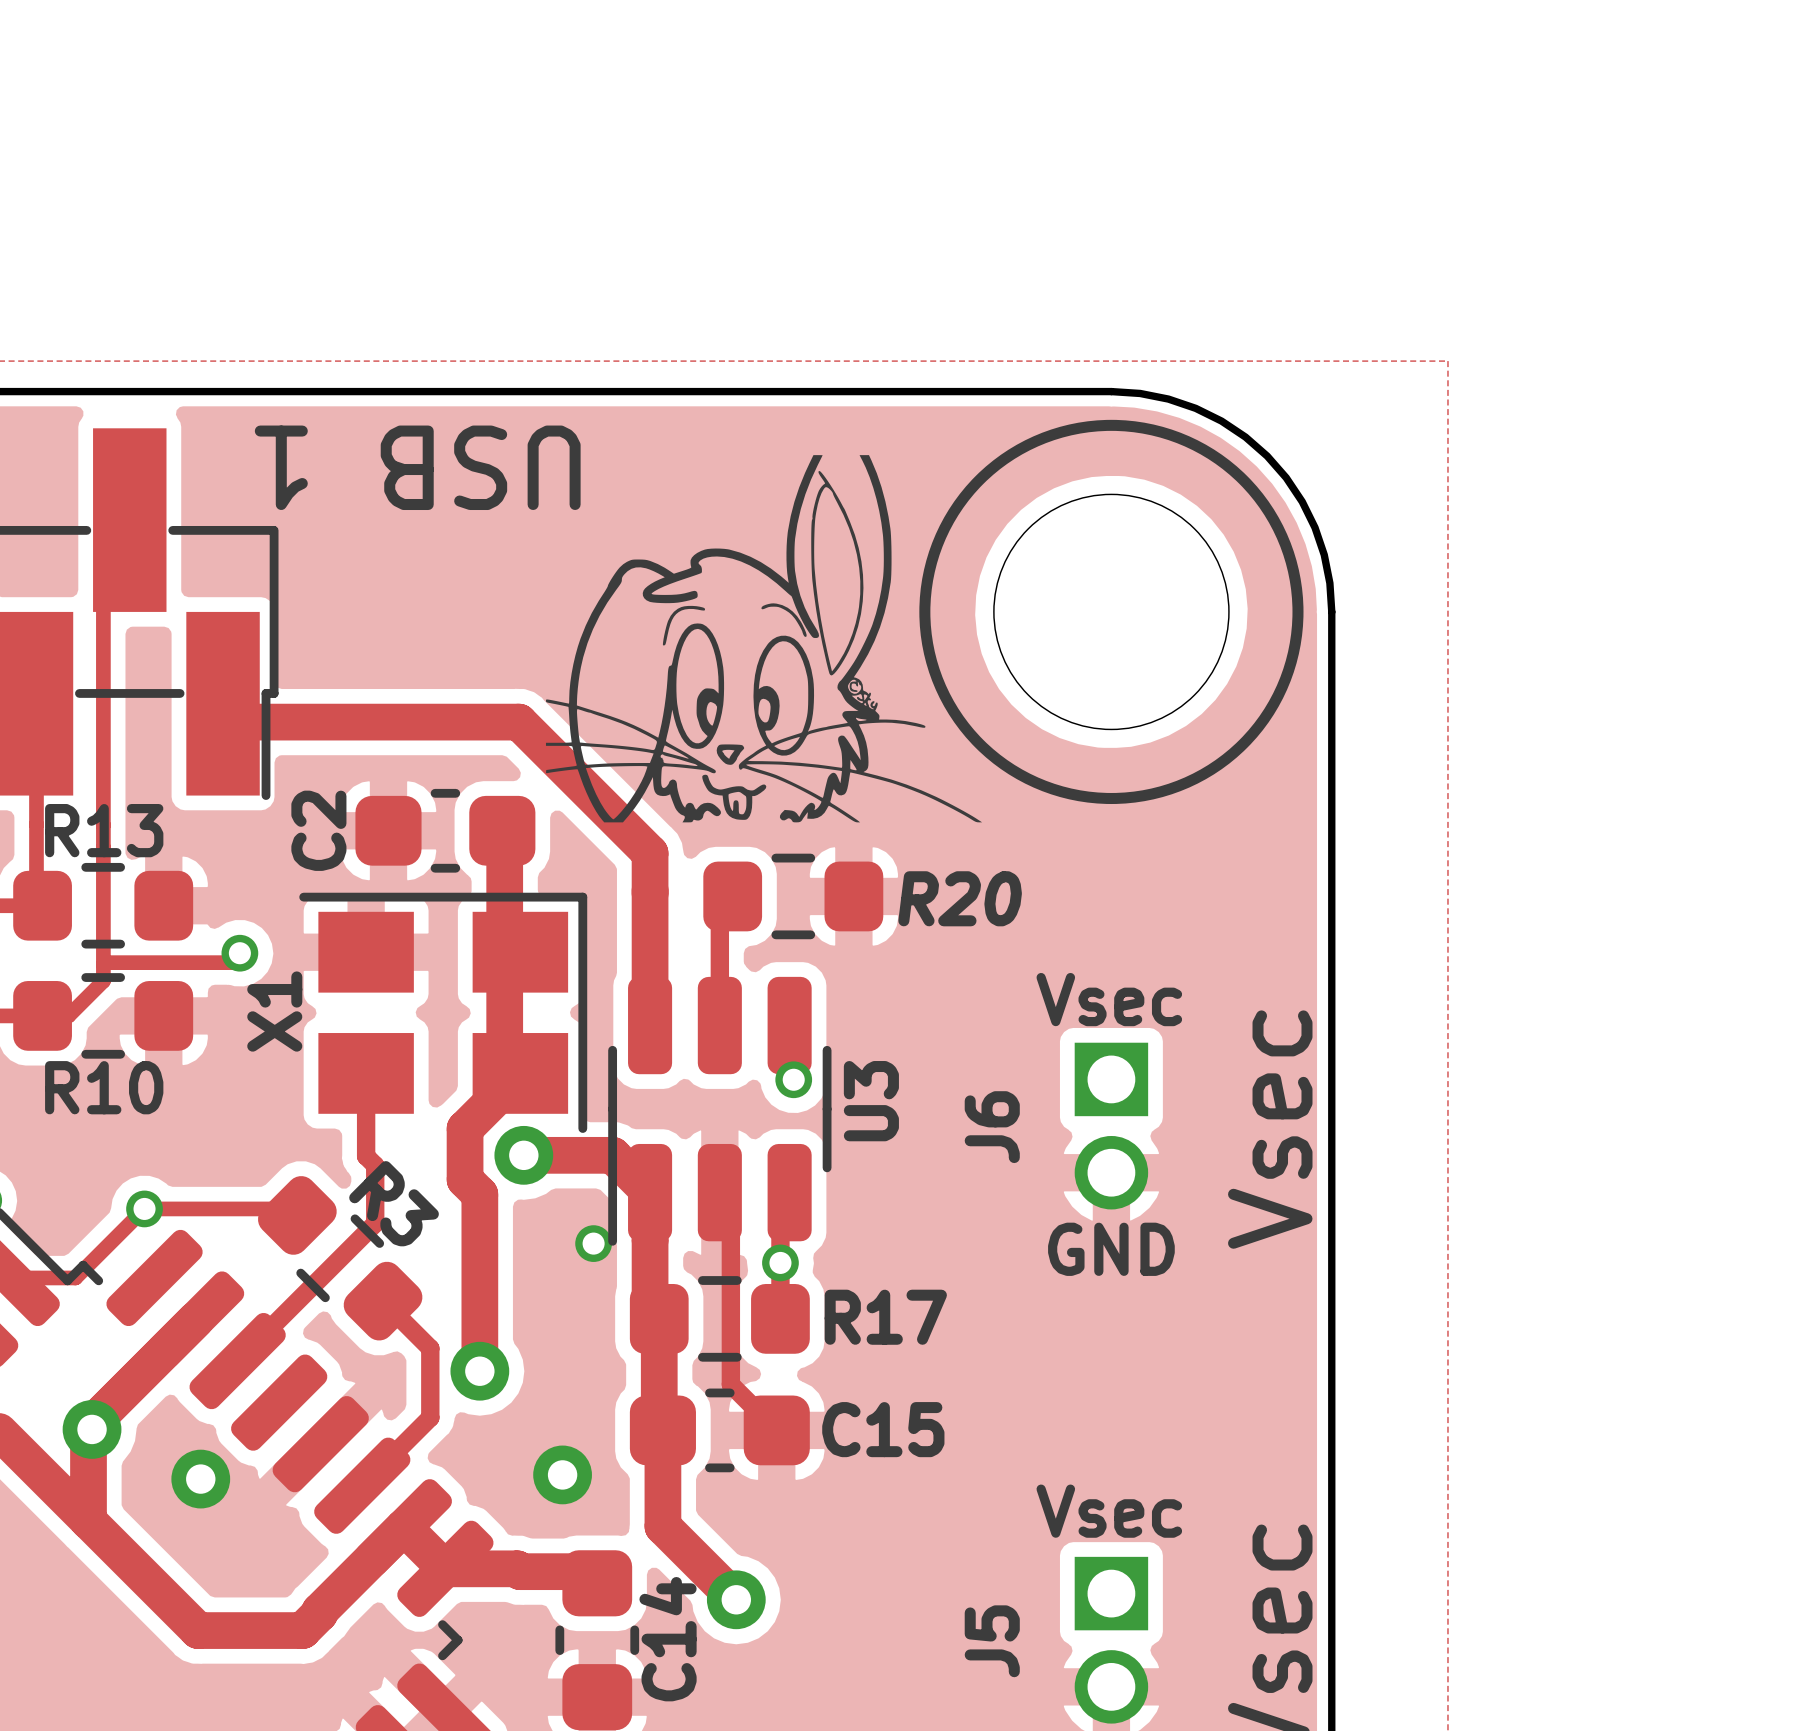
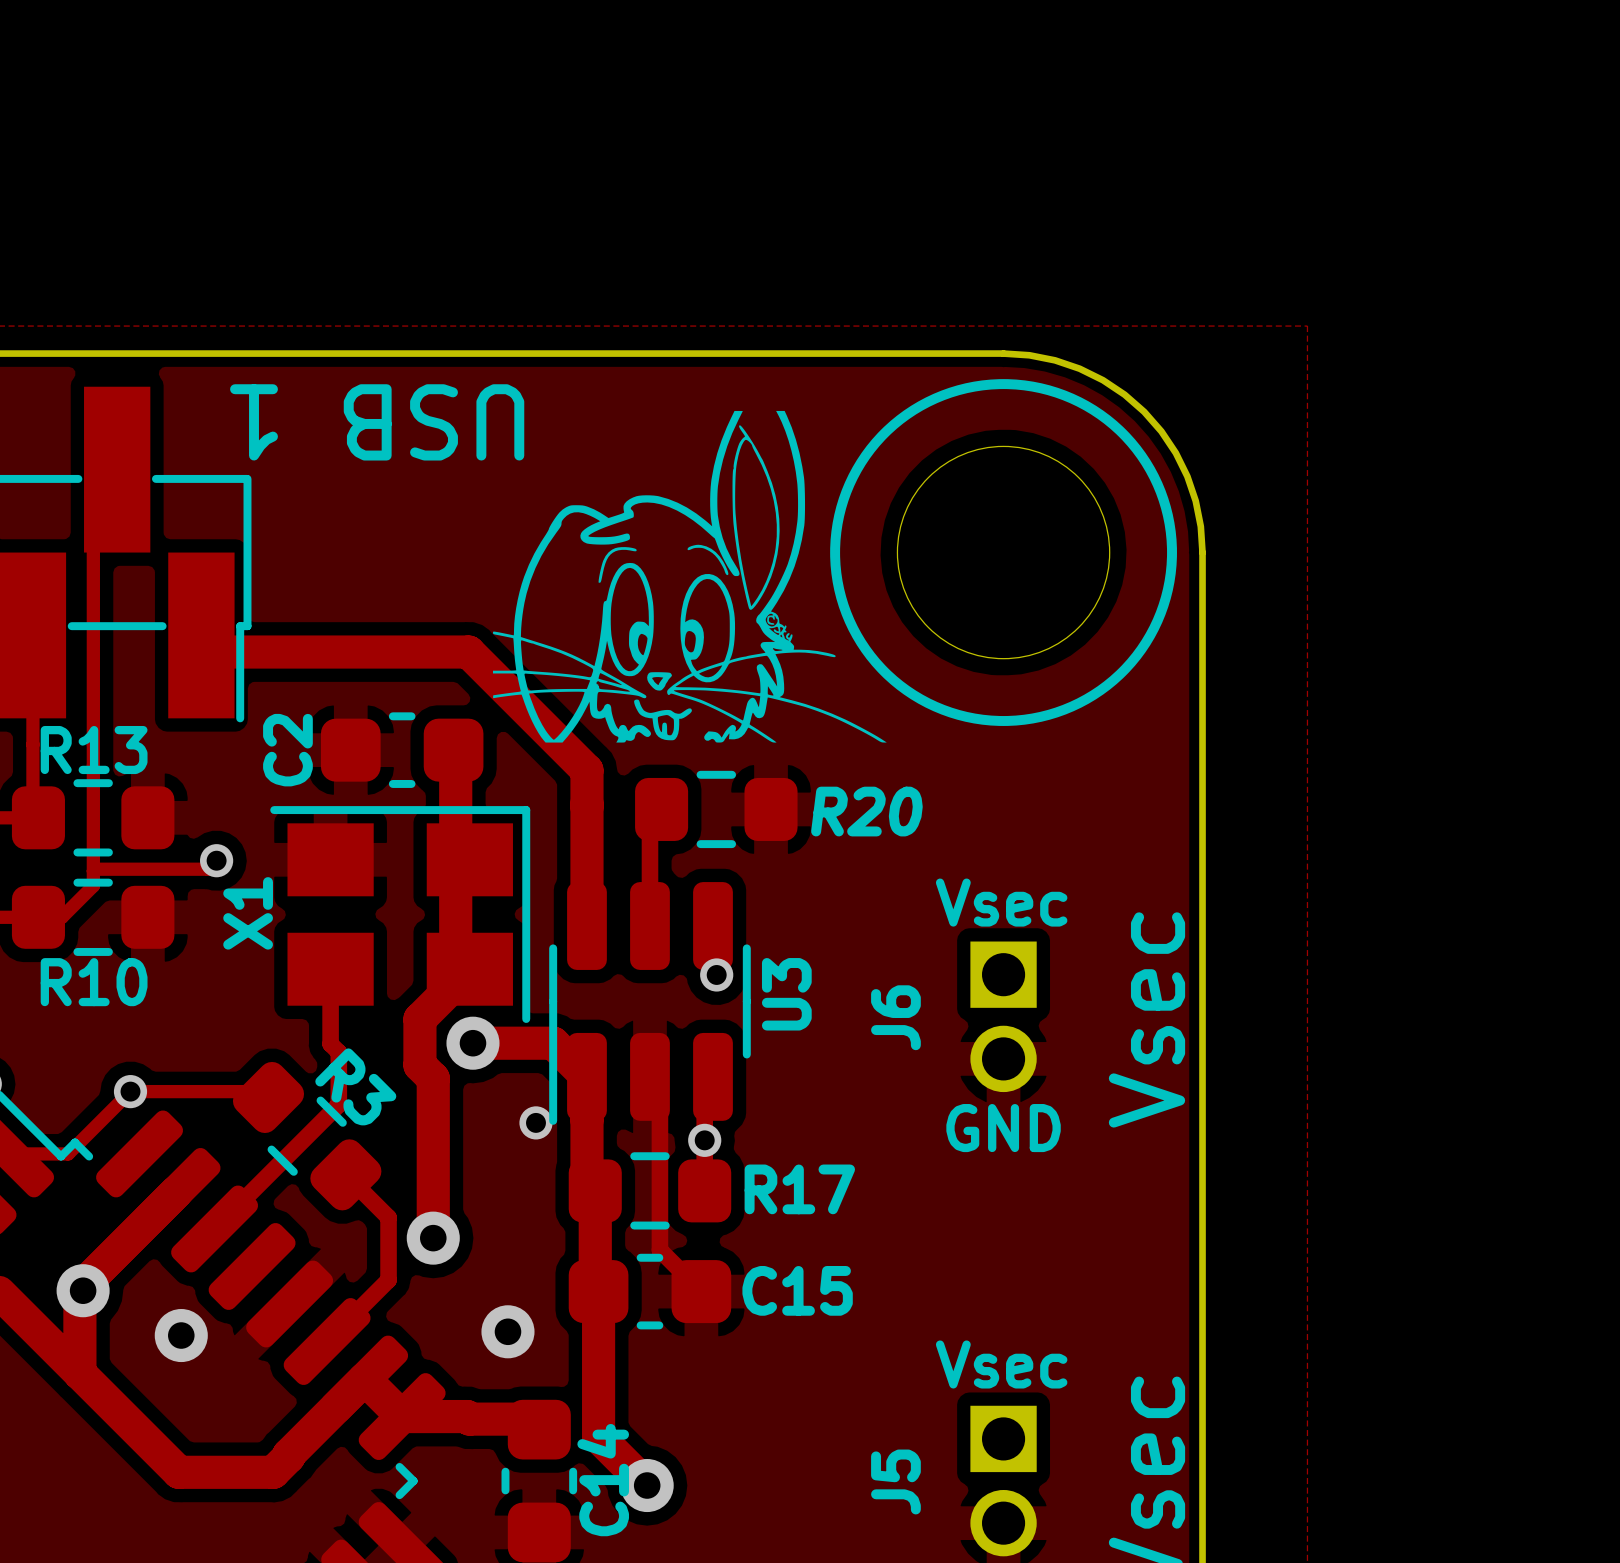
track: (662, 1526) (736, 1599) -> (598, 1378) (598, 1436) (647, 1485)
via position: (736, 1599) -> (647, 1485)

